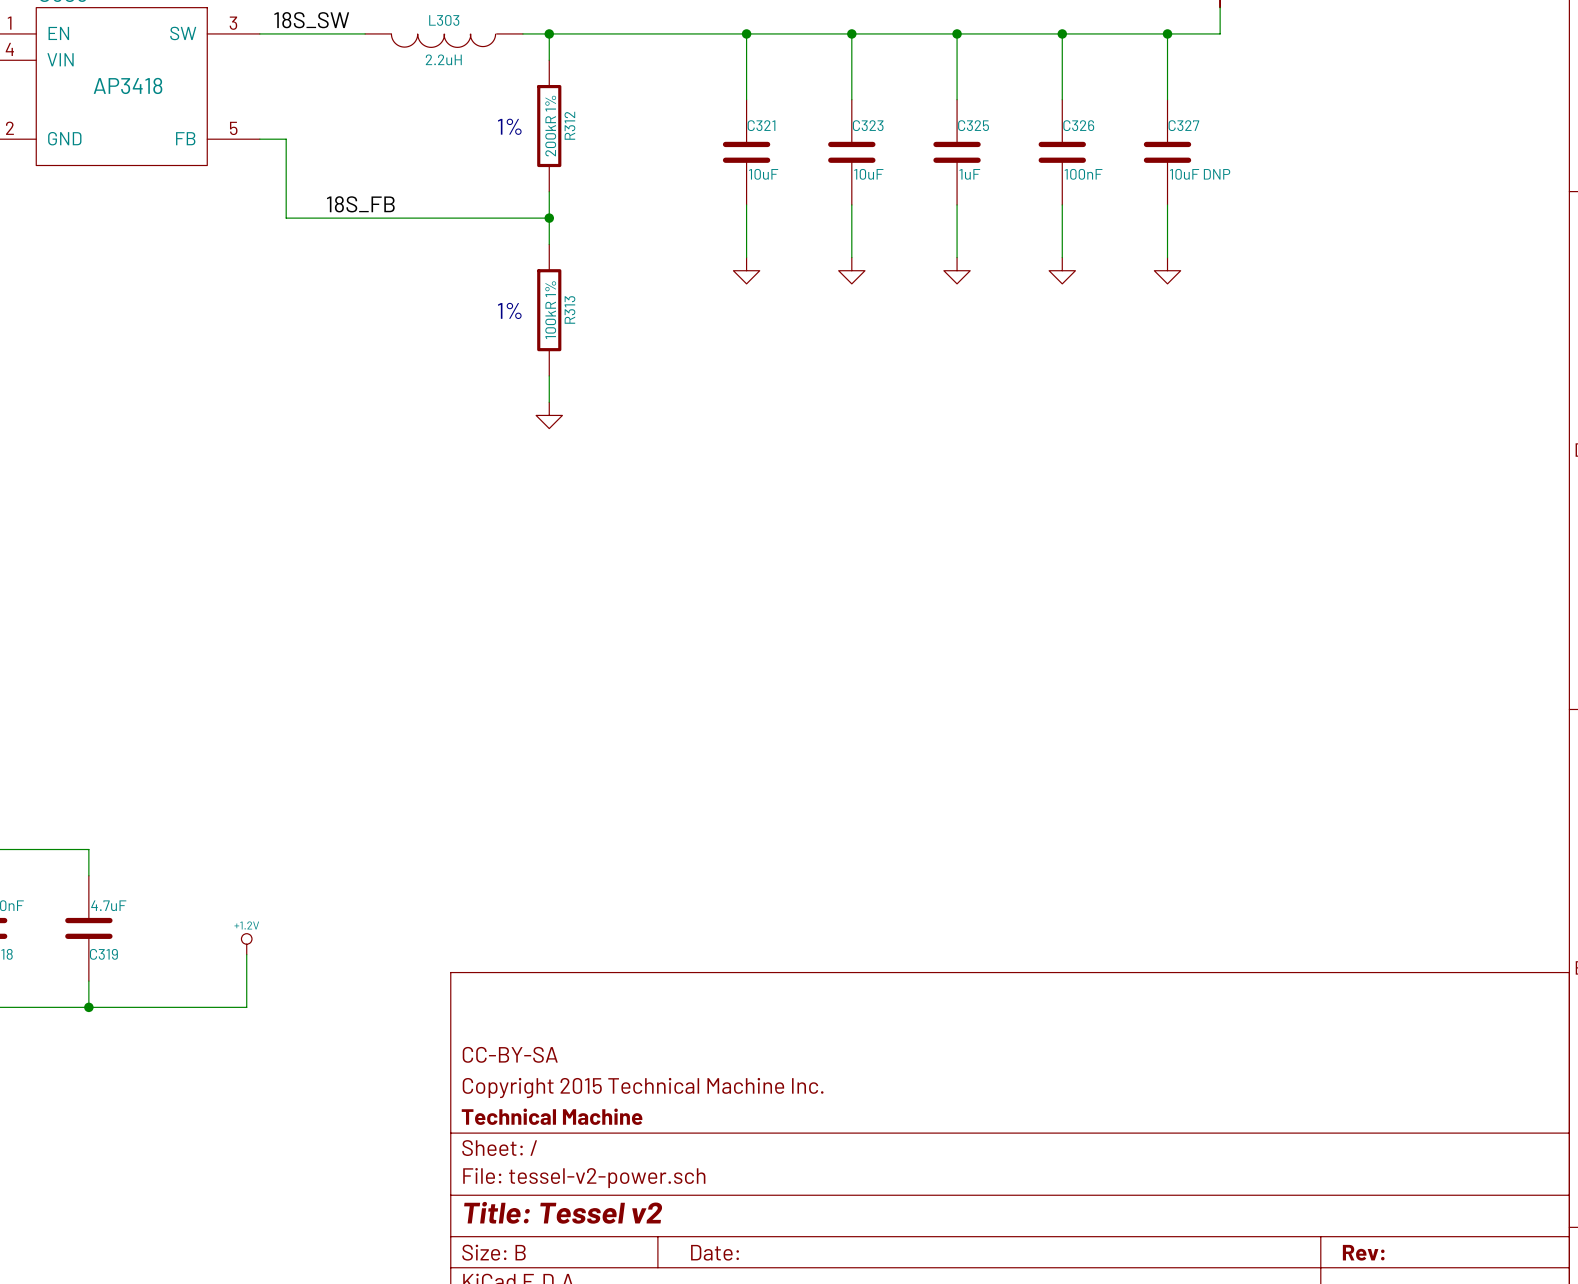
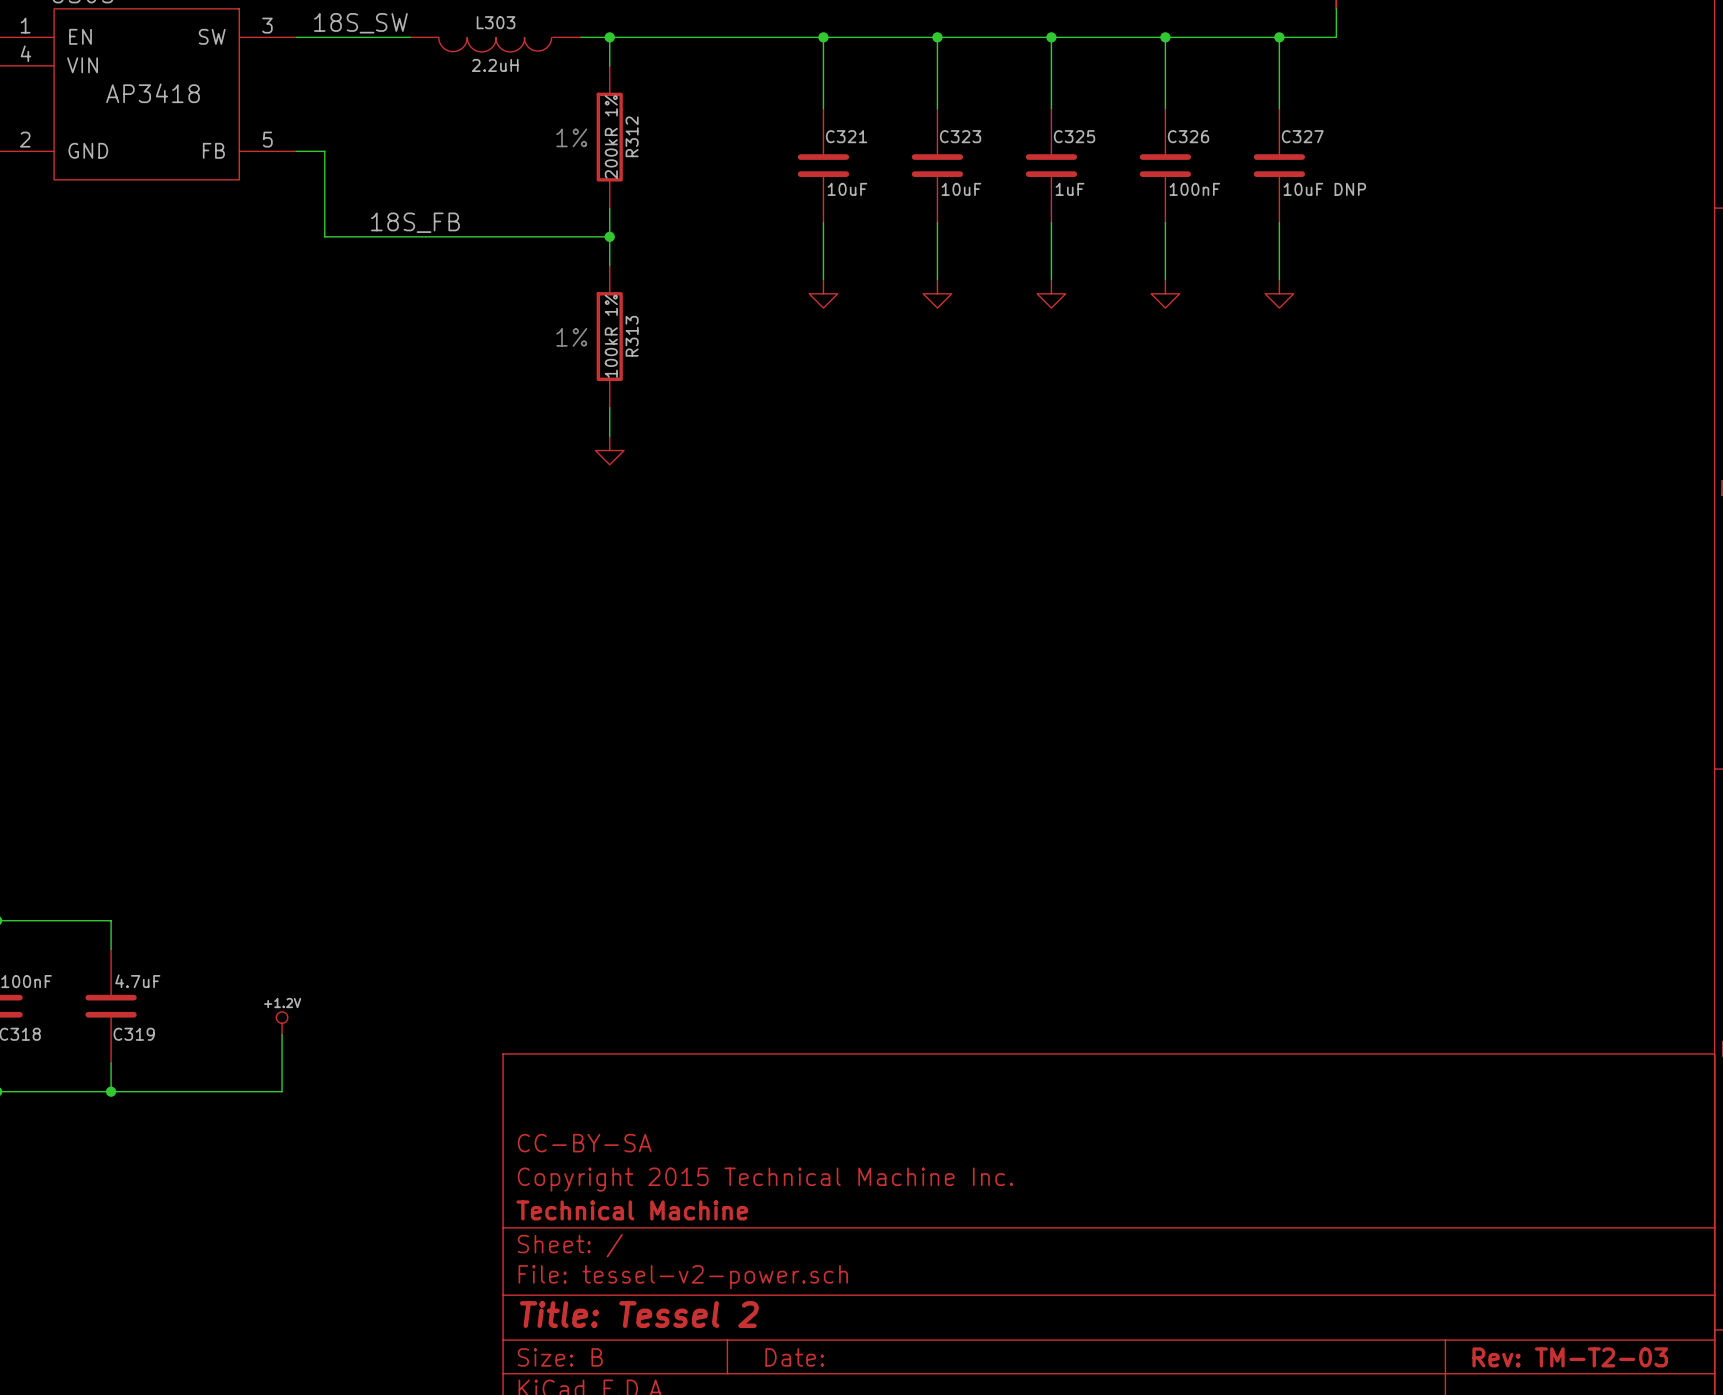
title block: Title: Tessel v2 (563, 1212) -> Title: Tessel 2 (639, 1314)
title block: Rev: (1363, 1252) -> Rev: TM-T2-03 (1570, 1357)

